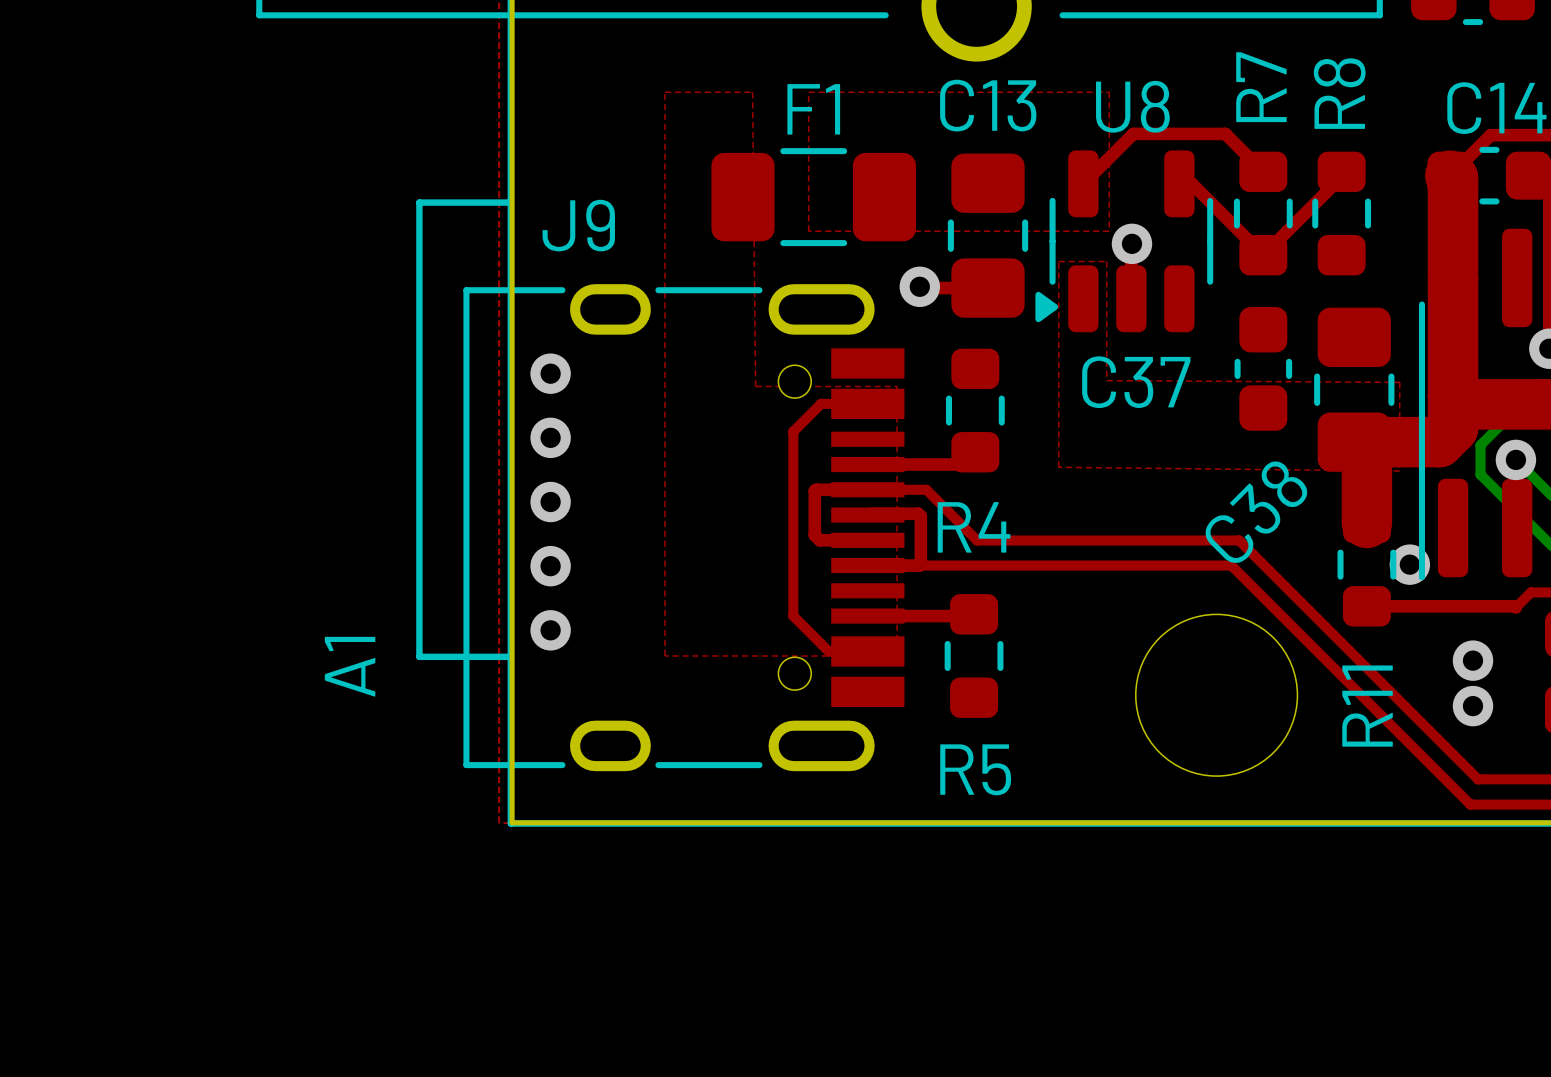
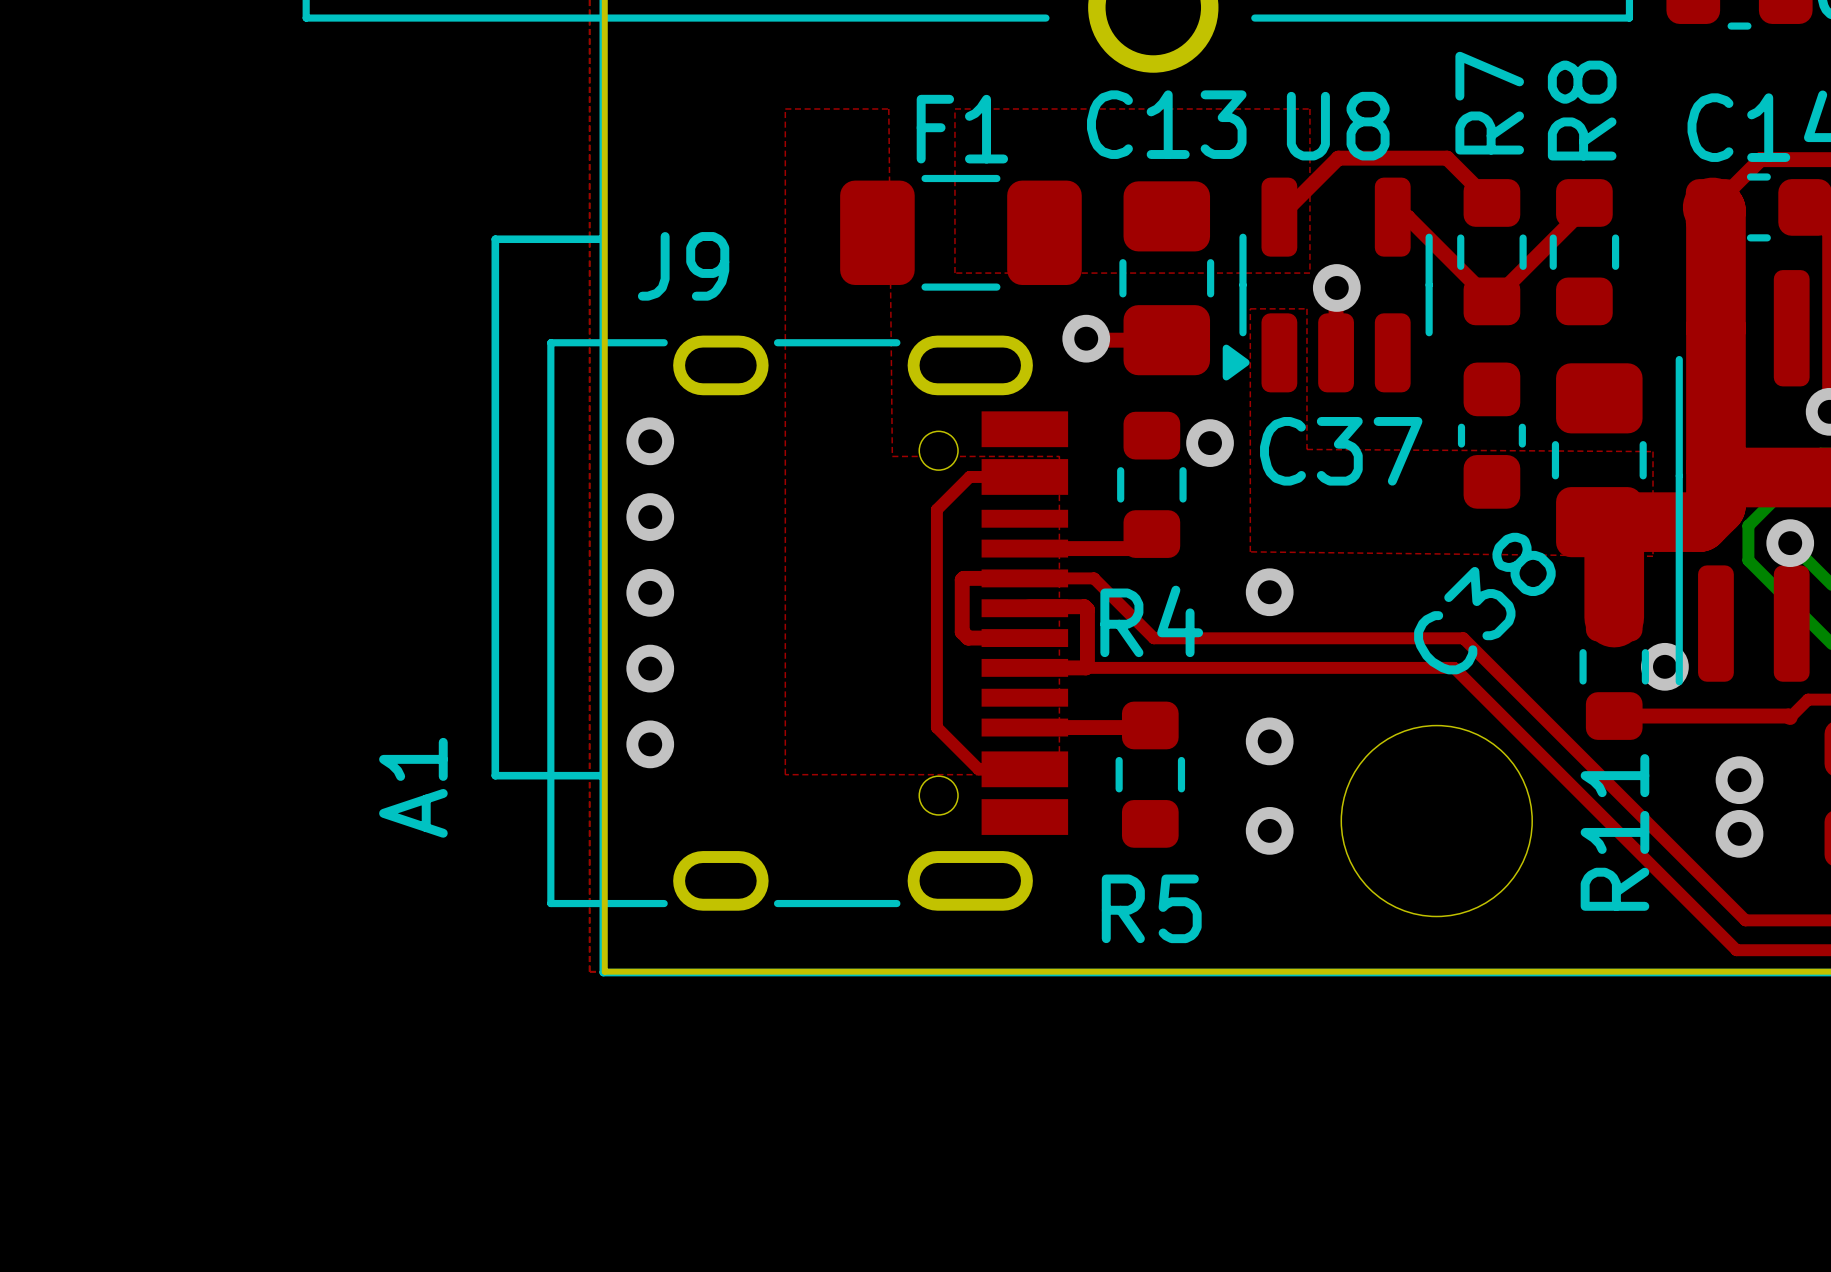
via: none -> (1210, 443)
via: none -> (1269, 592)
via: none -> (1269, 741)
via: none -> (1269, 830)

